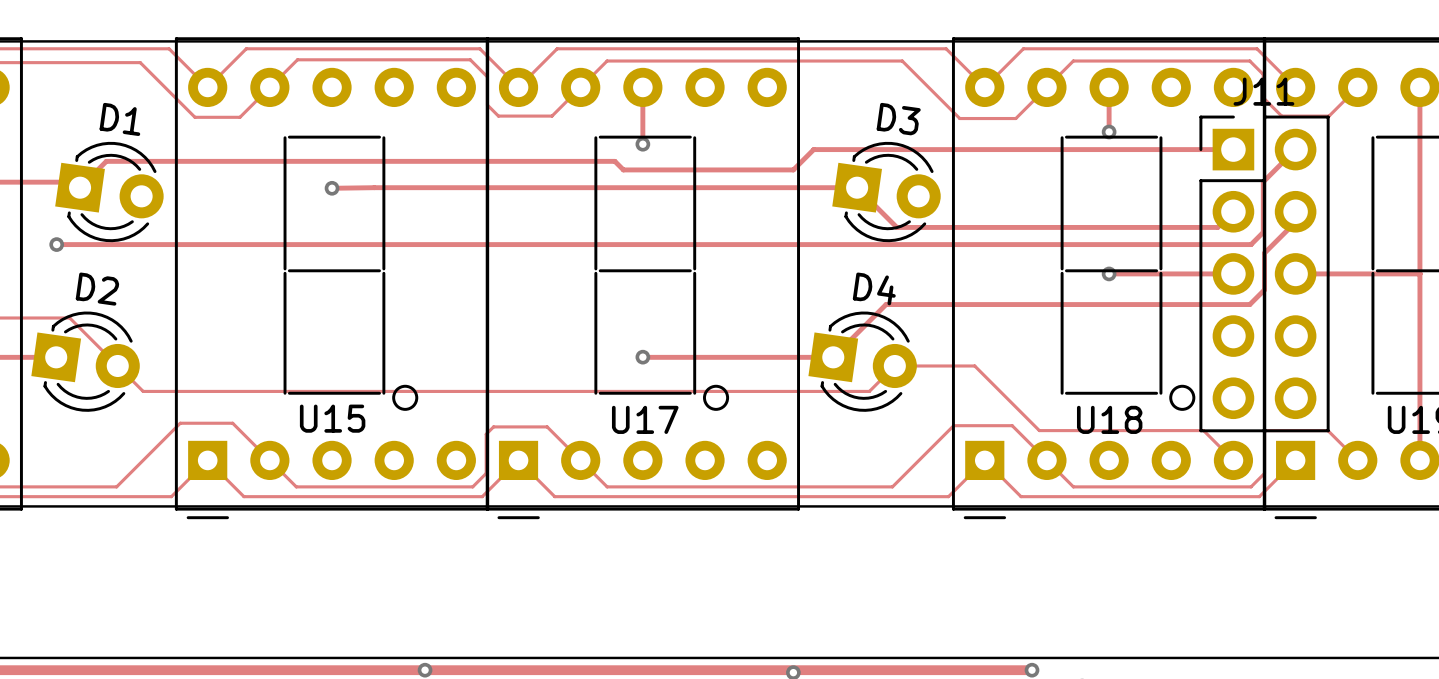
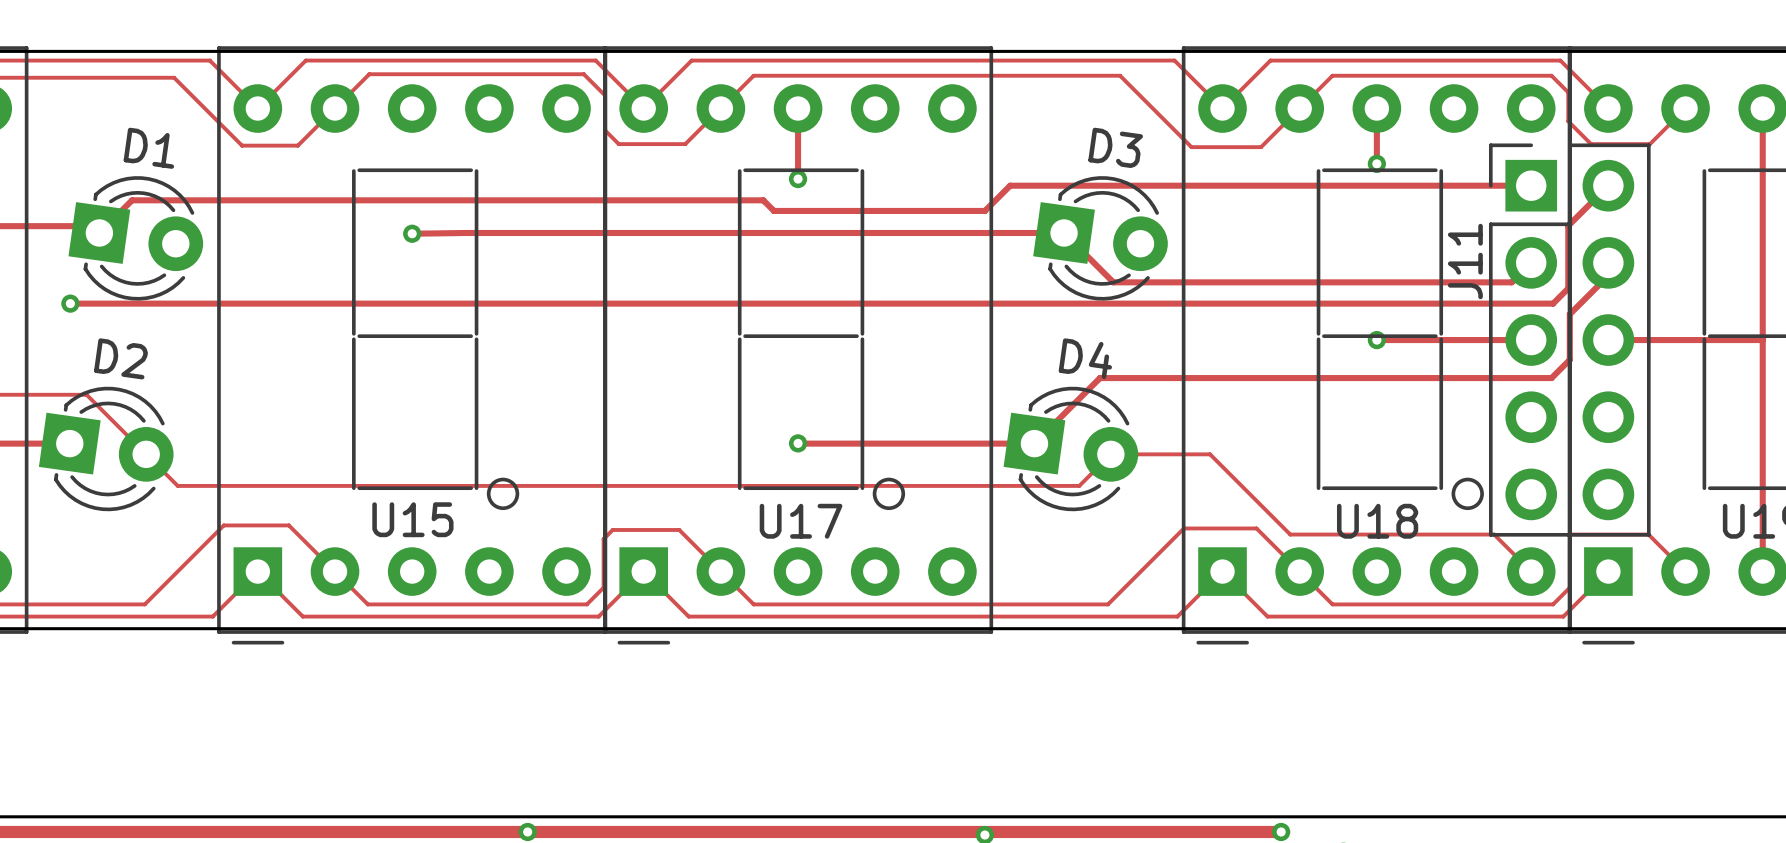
J11 name rotation: 0° (1263, 91) -> 90° counterclockwise (1465, 261)
J11 name position: J11 (1263, 91) -> J11 (1465, 261)

